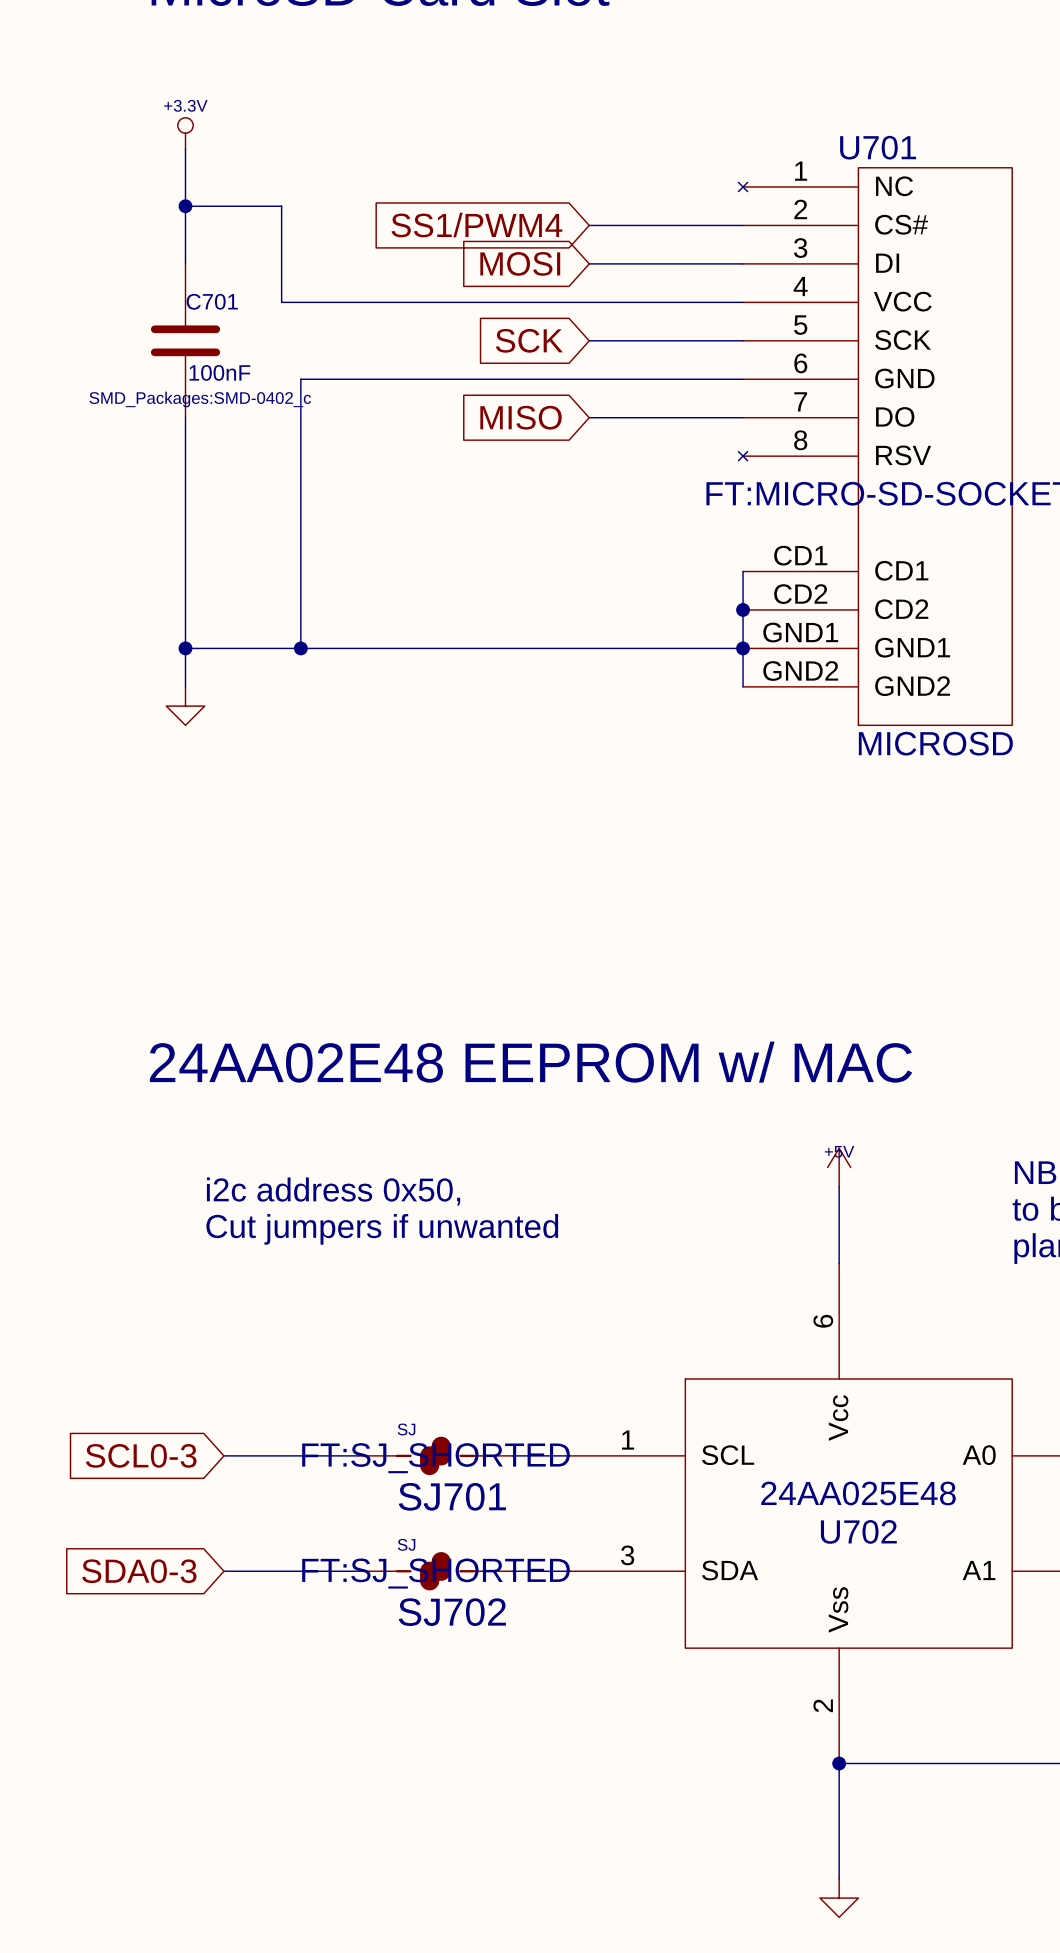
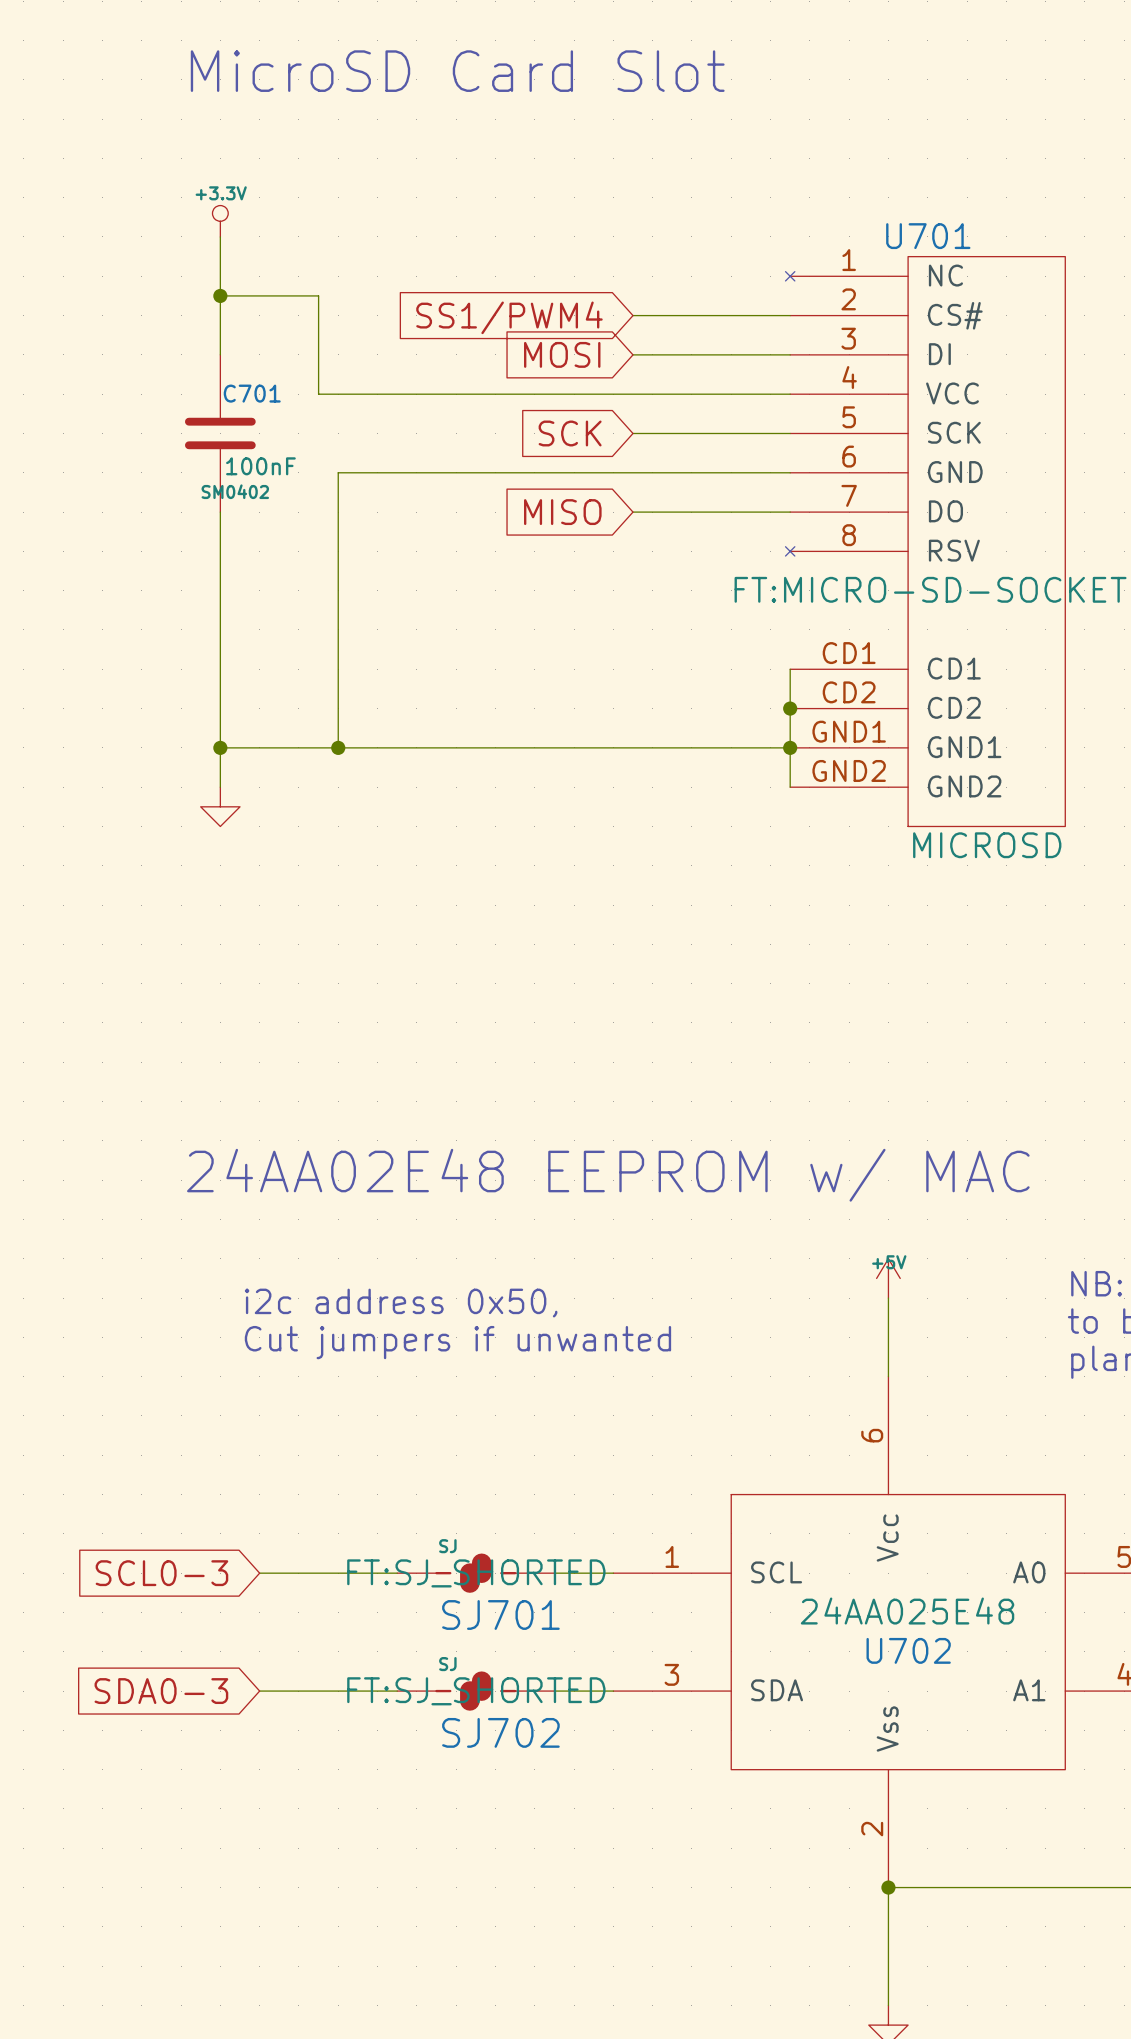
C701 text: SMD_Packages:SMD-0402_c (200, 399) -> SM0402 (235, 491)

